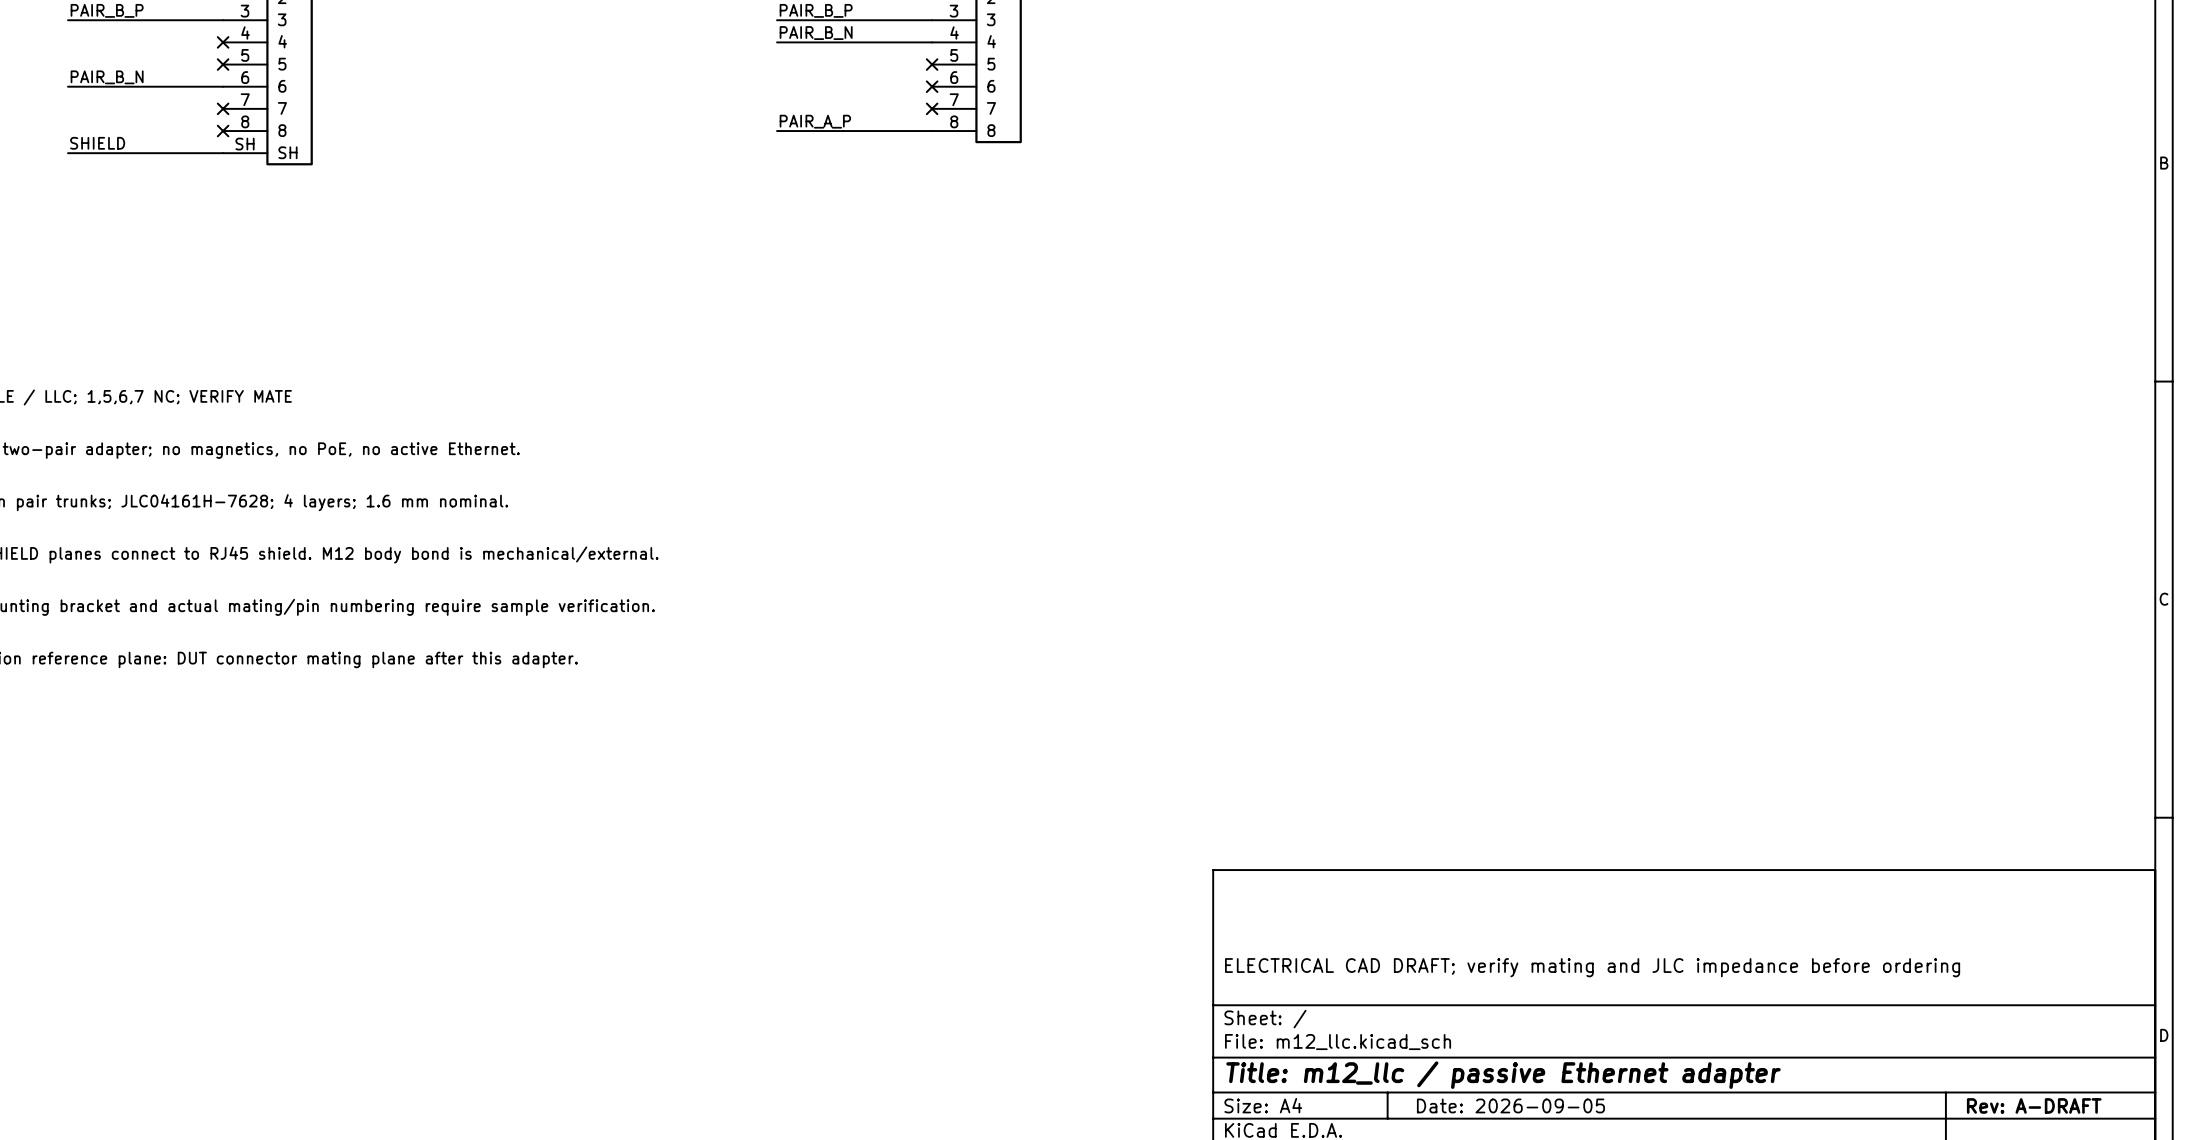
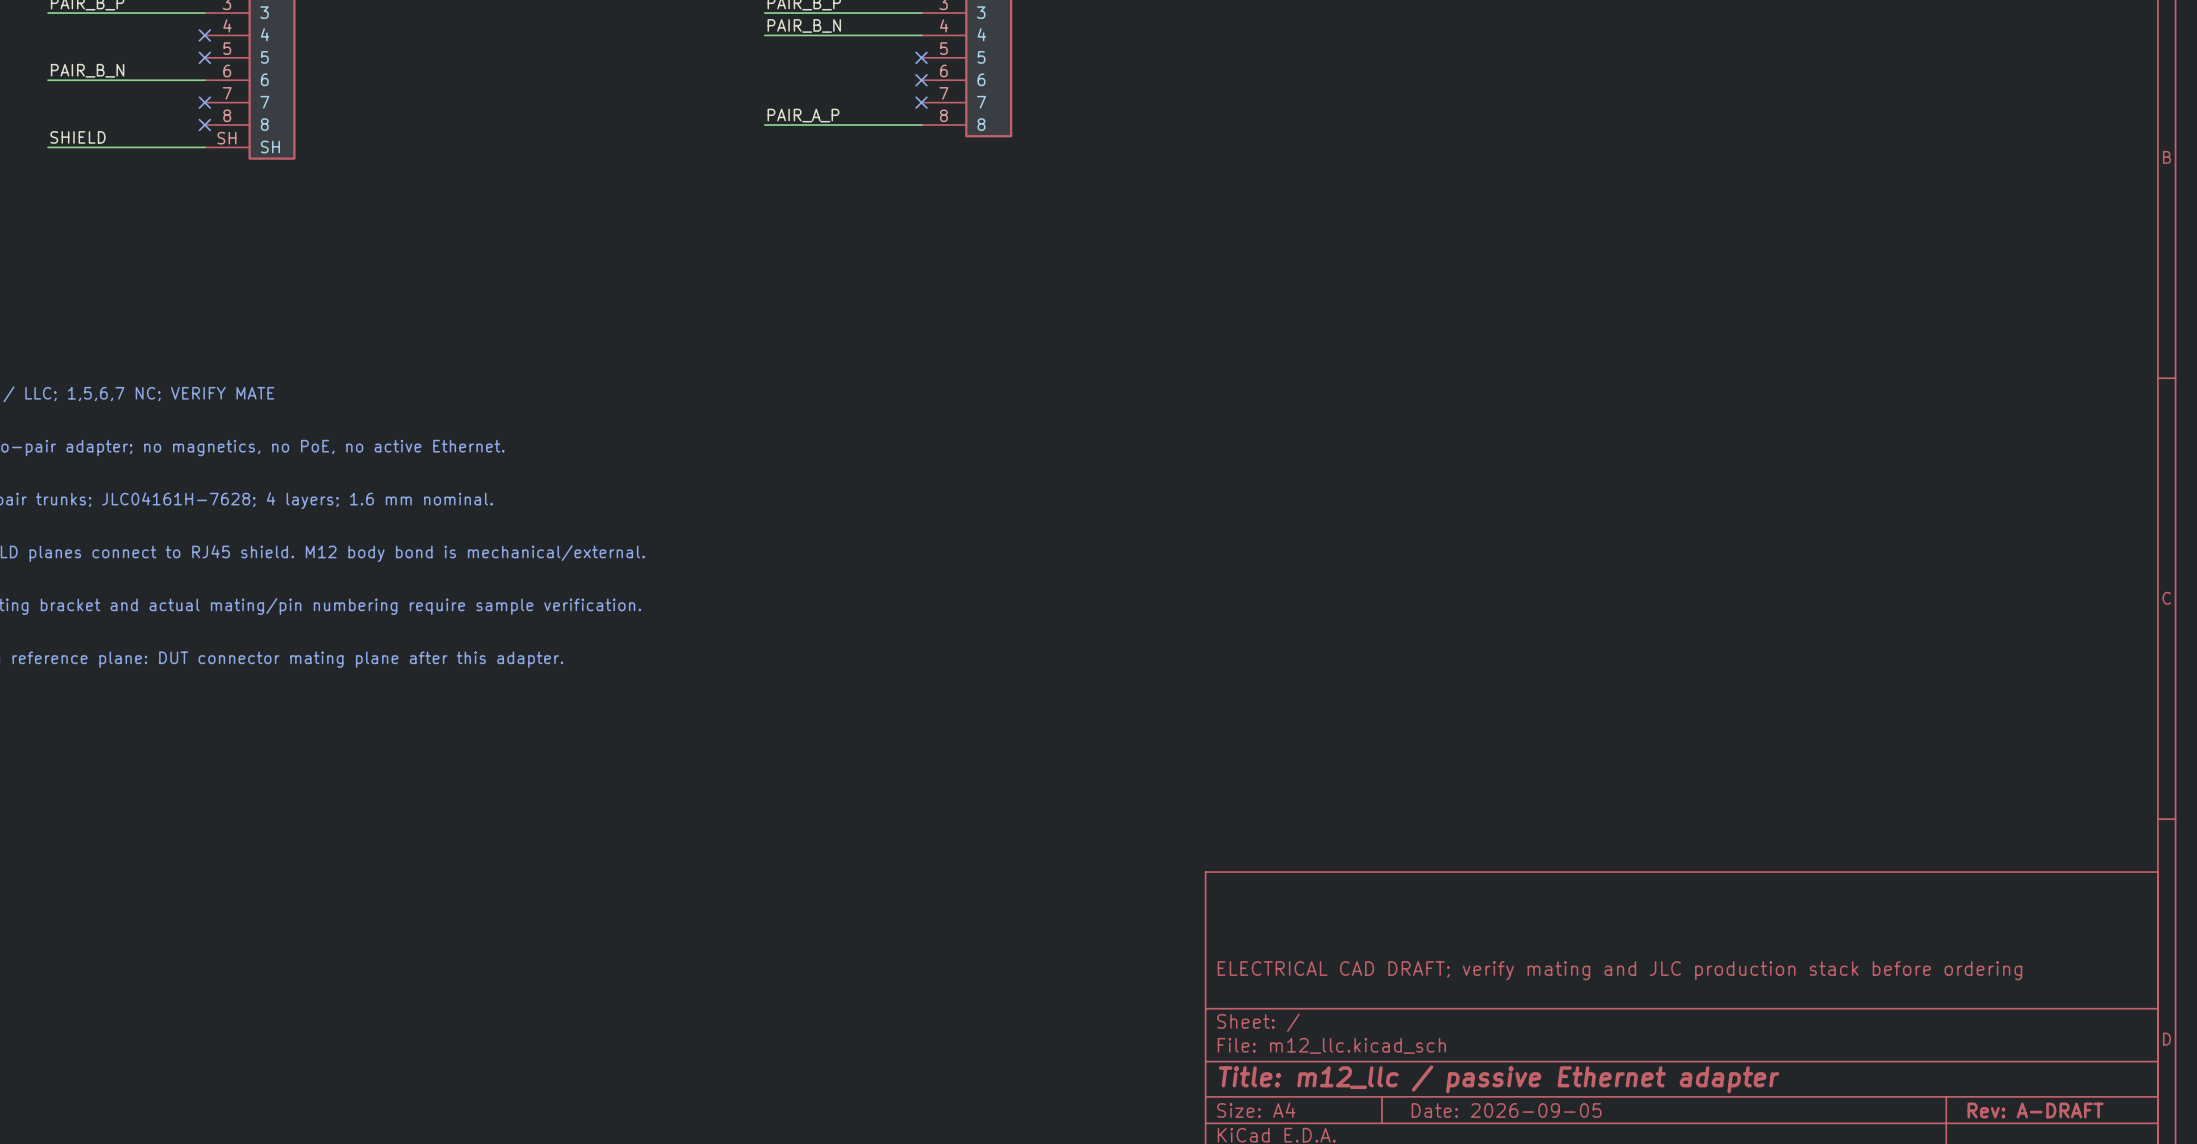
title block: ELECTRICAL CAD DRAFT; verify mating and JLC impedance before ordering (1592, 967) -> ELECTRICAL CAD DRAFT; verify mating and JLC production stack before ordering (1619, 970)

